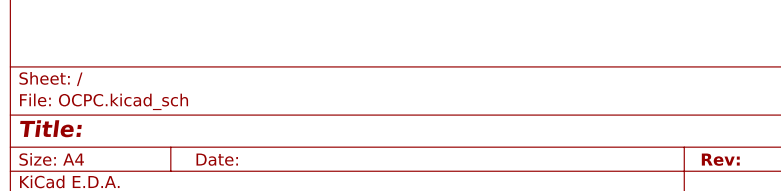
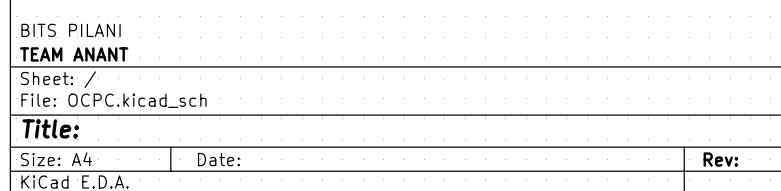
title block: none -> BITS PILANI (71, 30)
title block: none -> TEAM ANANT (74, 54)

